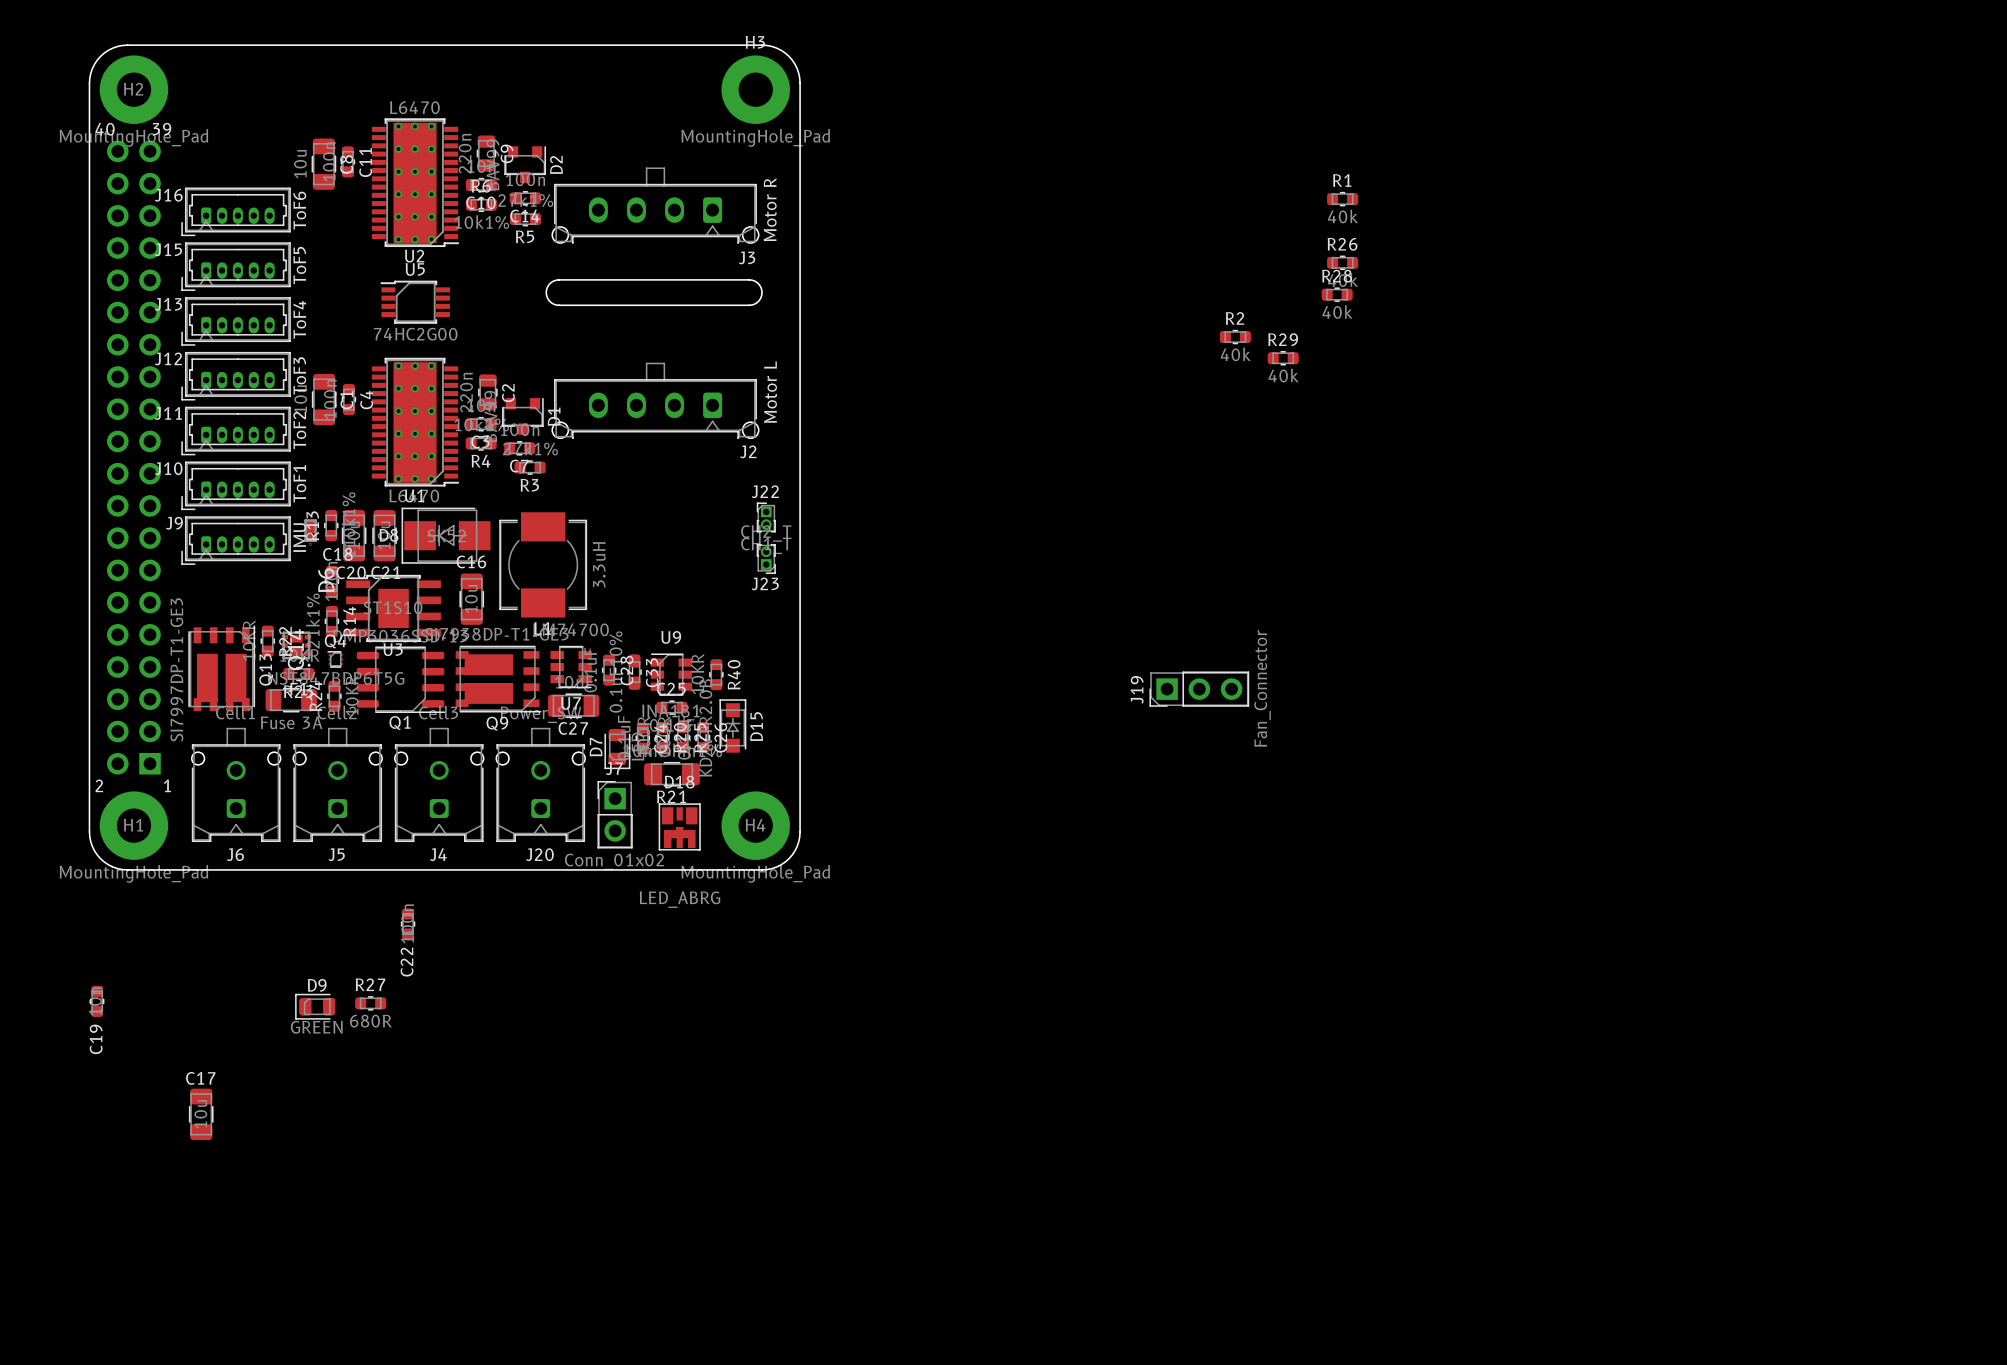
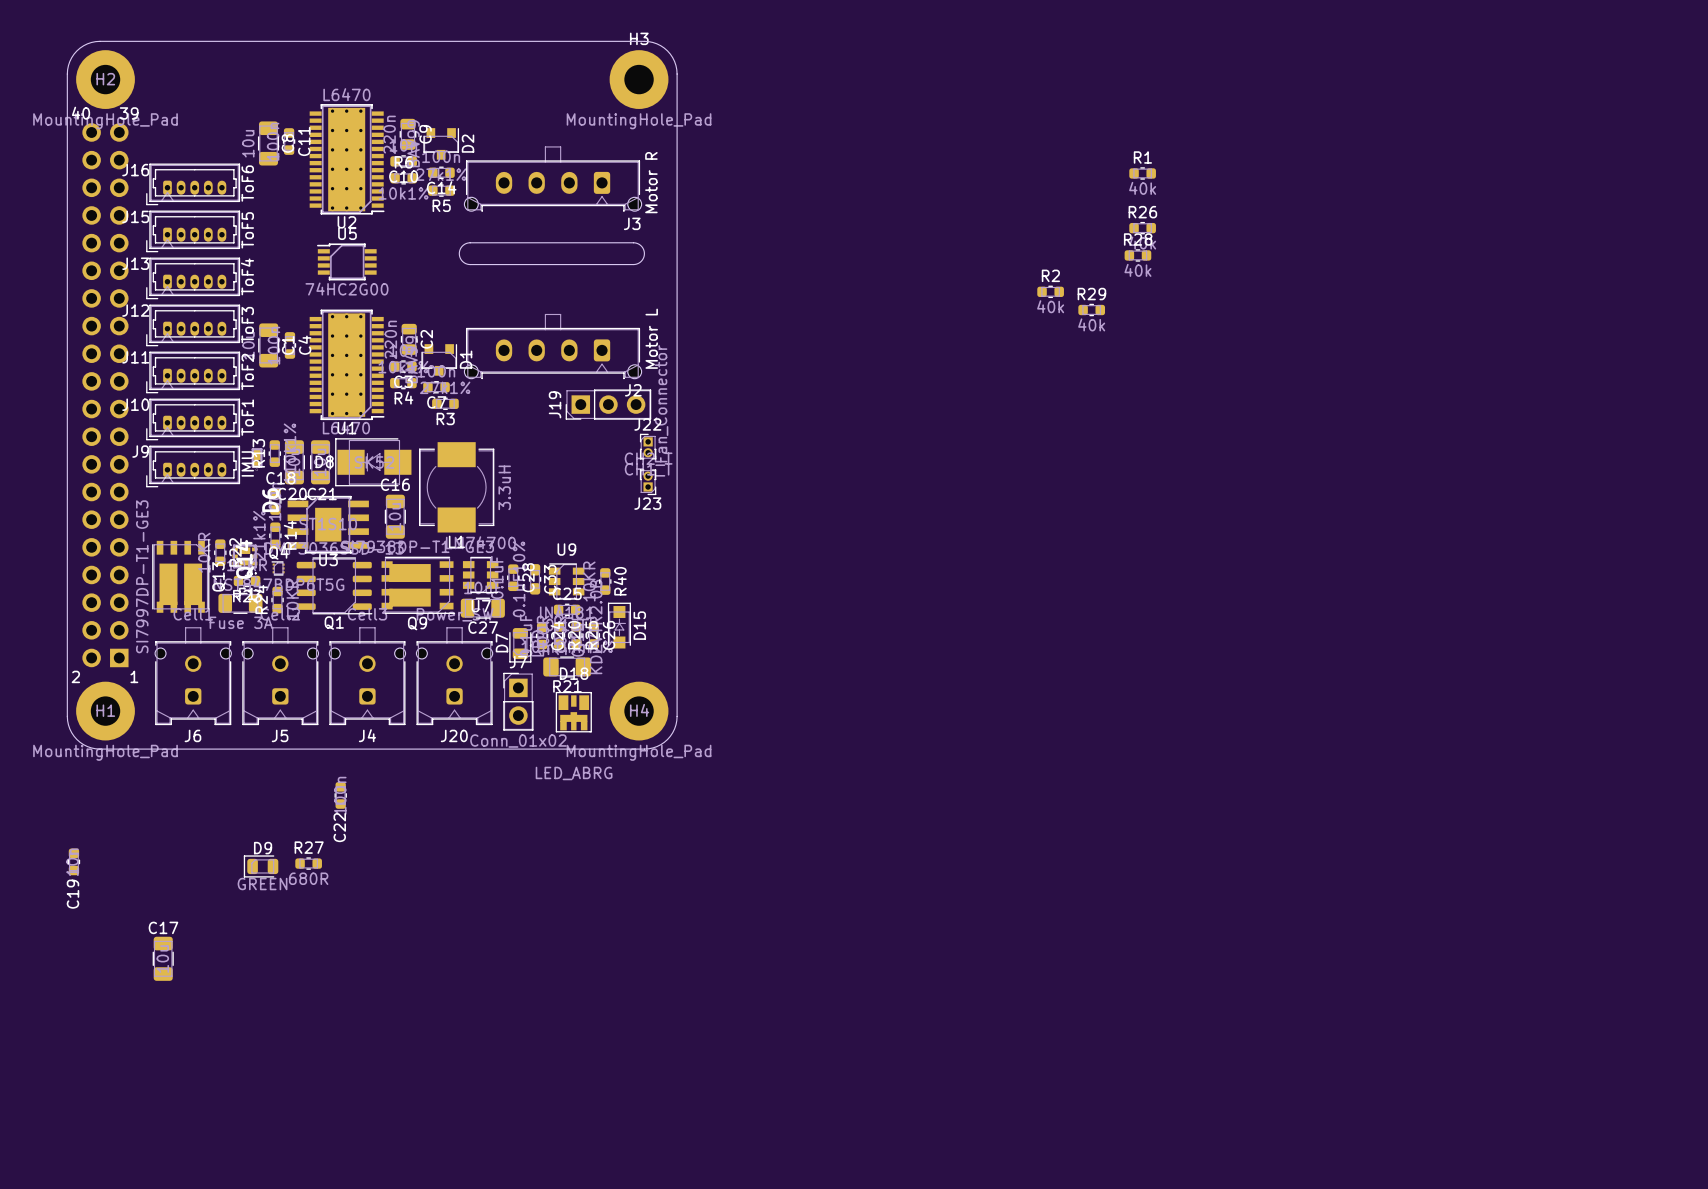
J19 position: (1199, 689) -> (608, 404)

